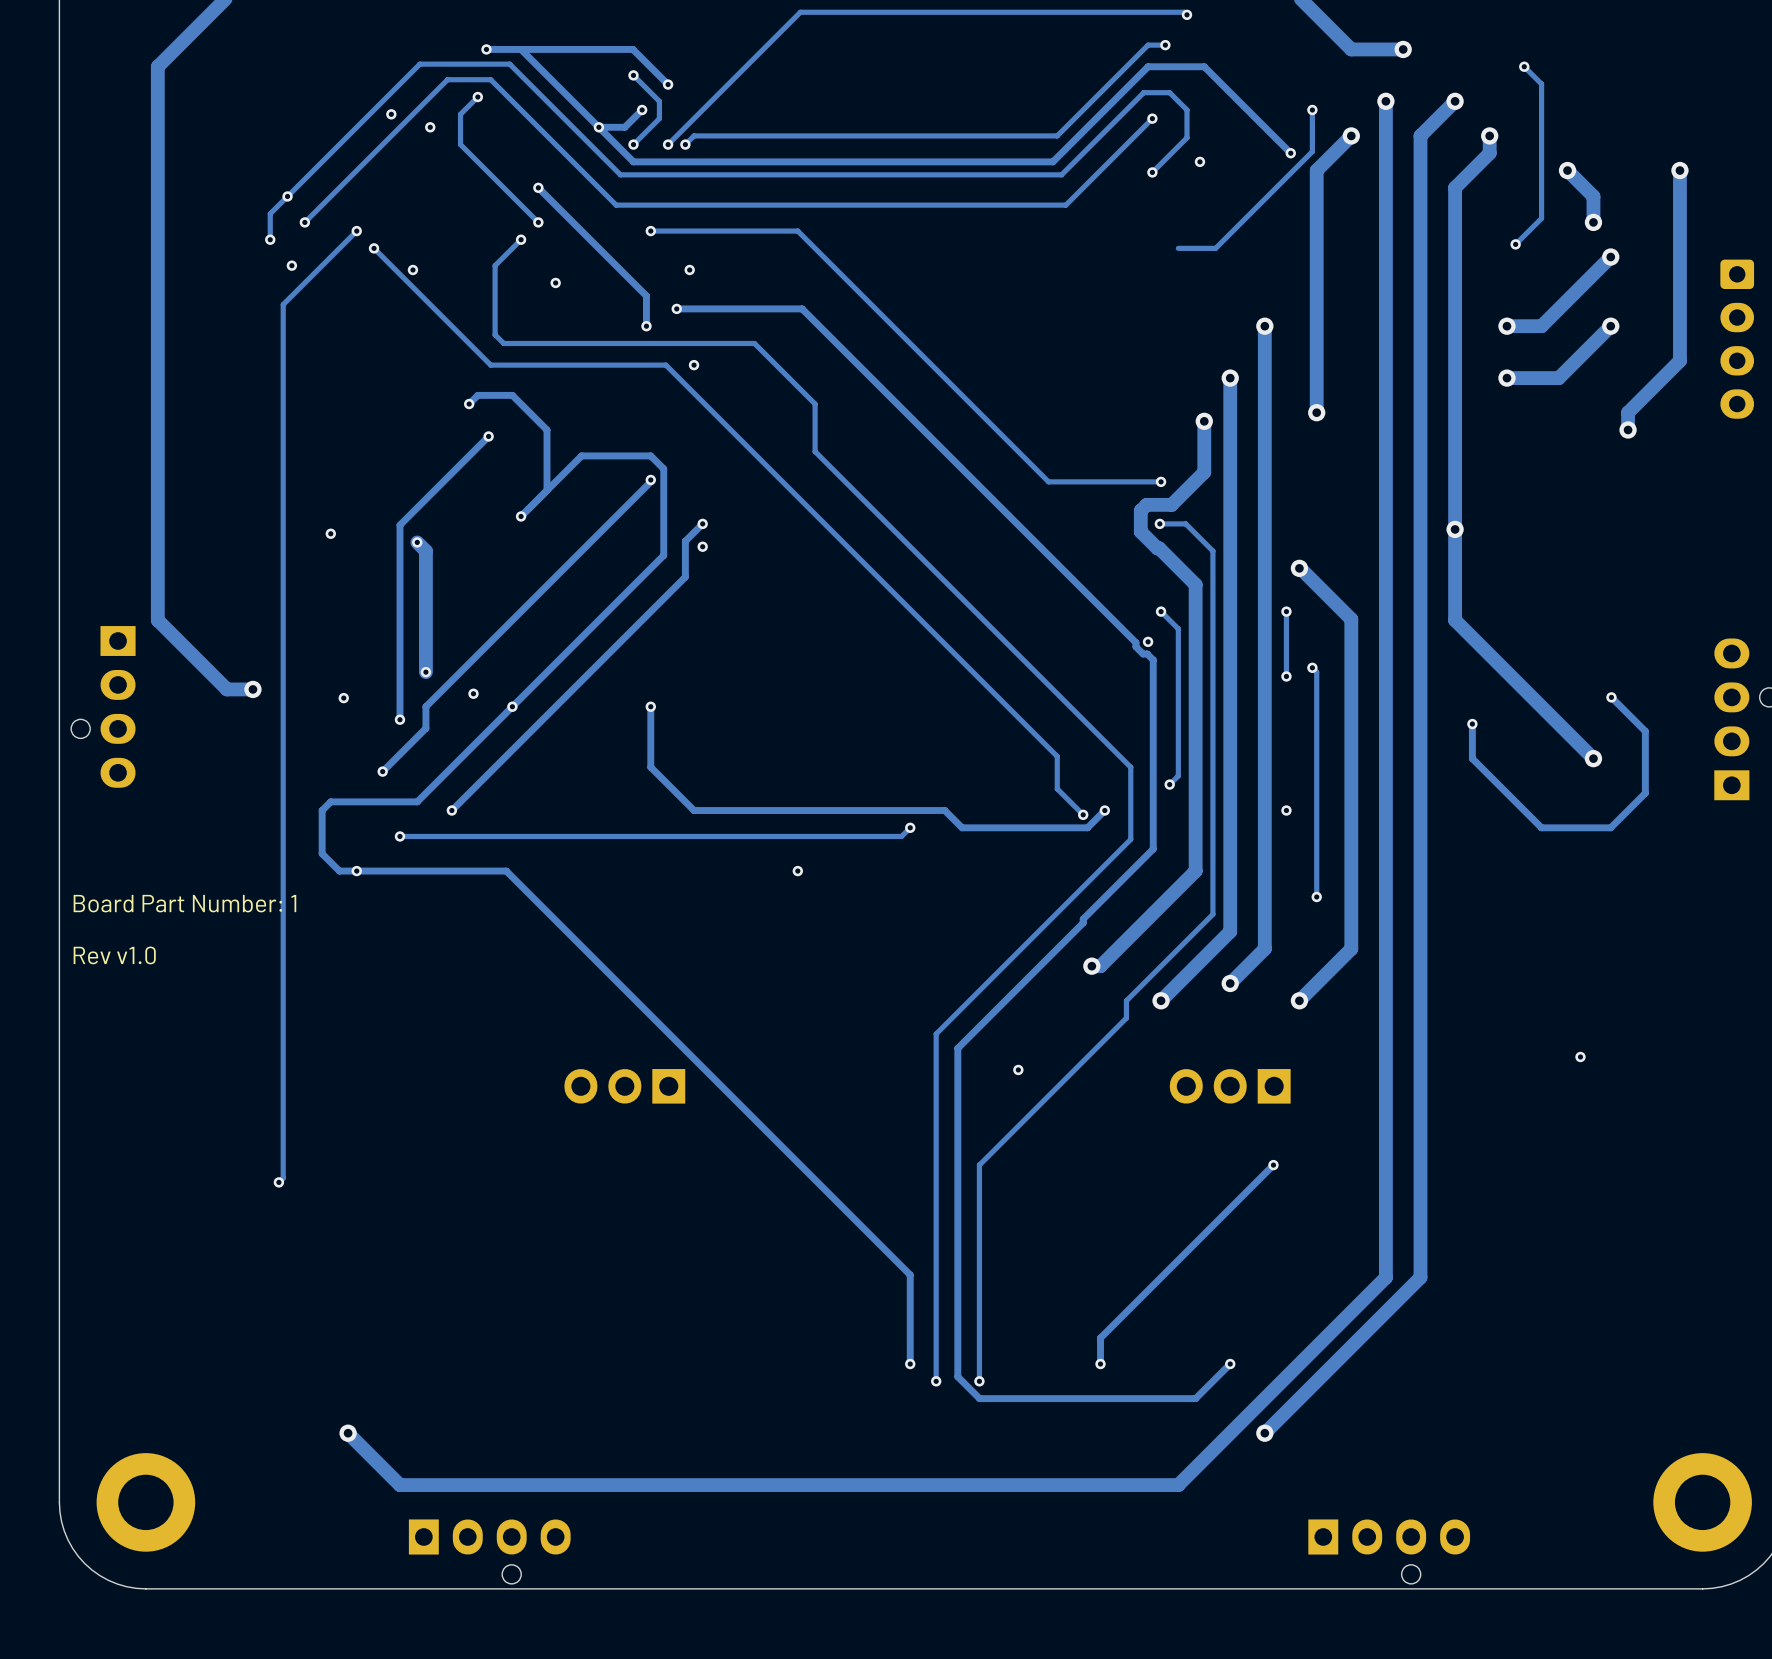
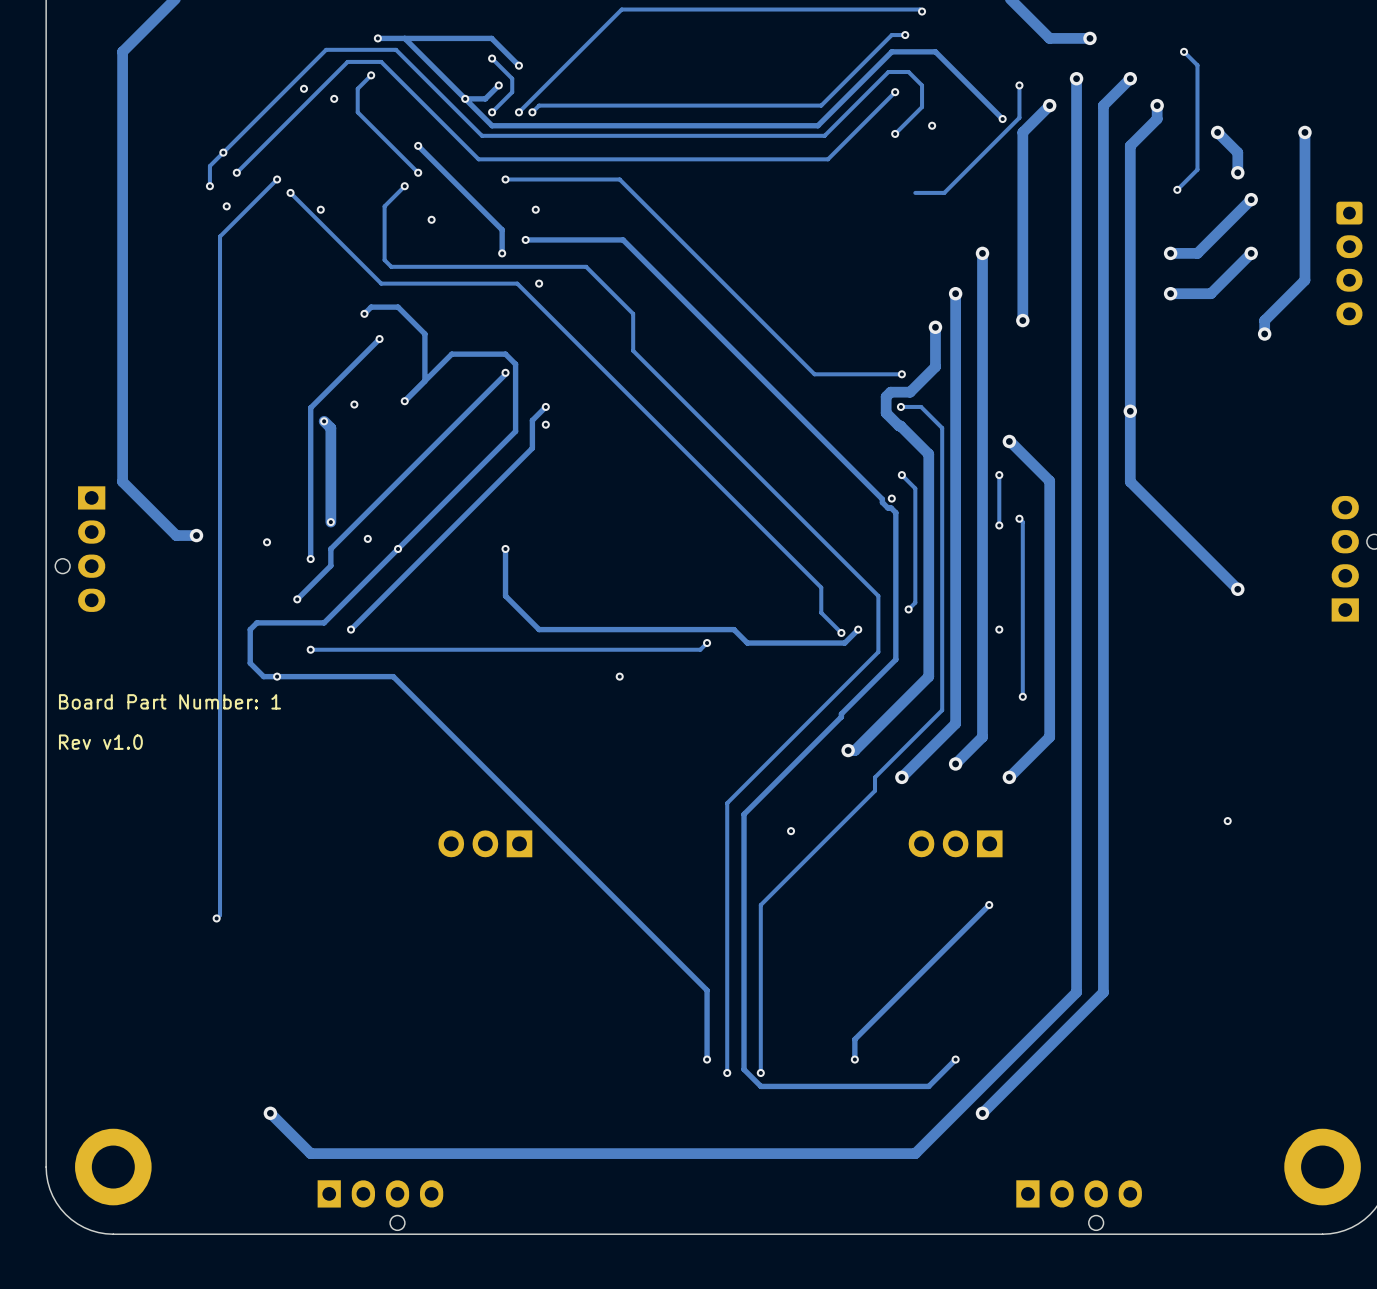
via: none -> (354, 404)
via: (330, 533) -> none
track: (1611, 697) (1645, 731) (1645, 793) (1610, 827) (1541, 827) (1472, 758) (1472, 724) -> none
via: (1611, 697) -> none
via: (1472, 724) -> none

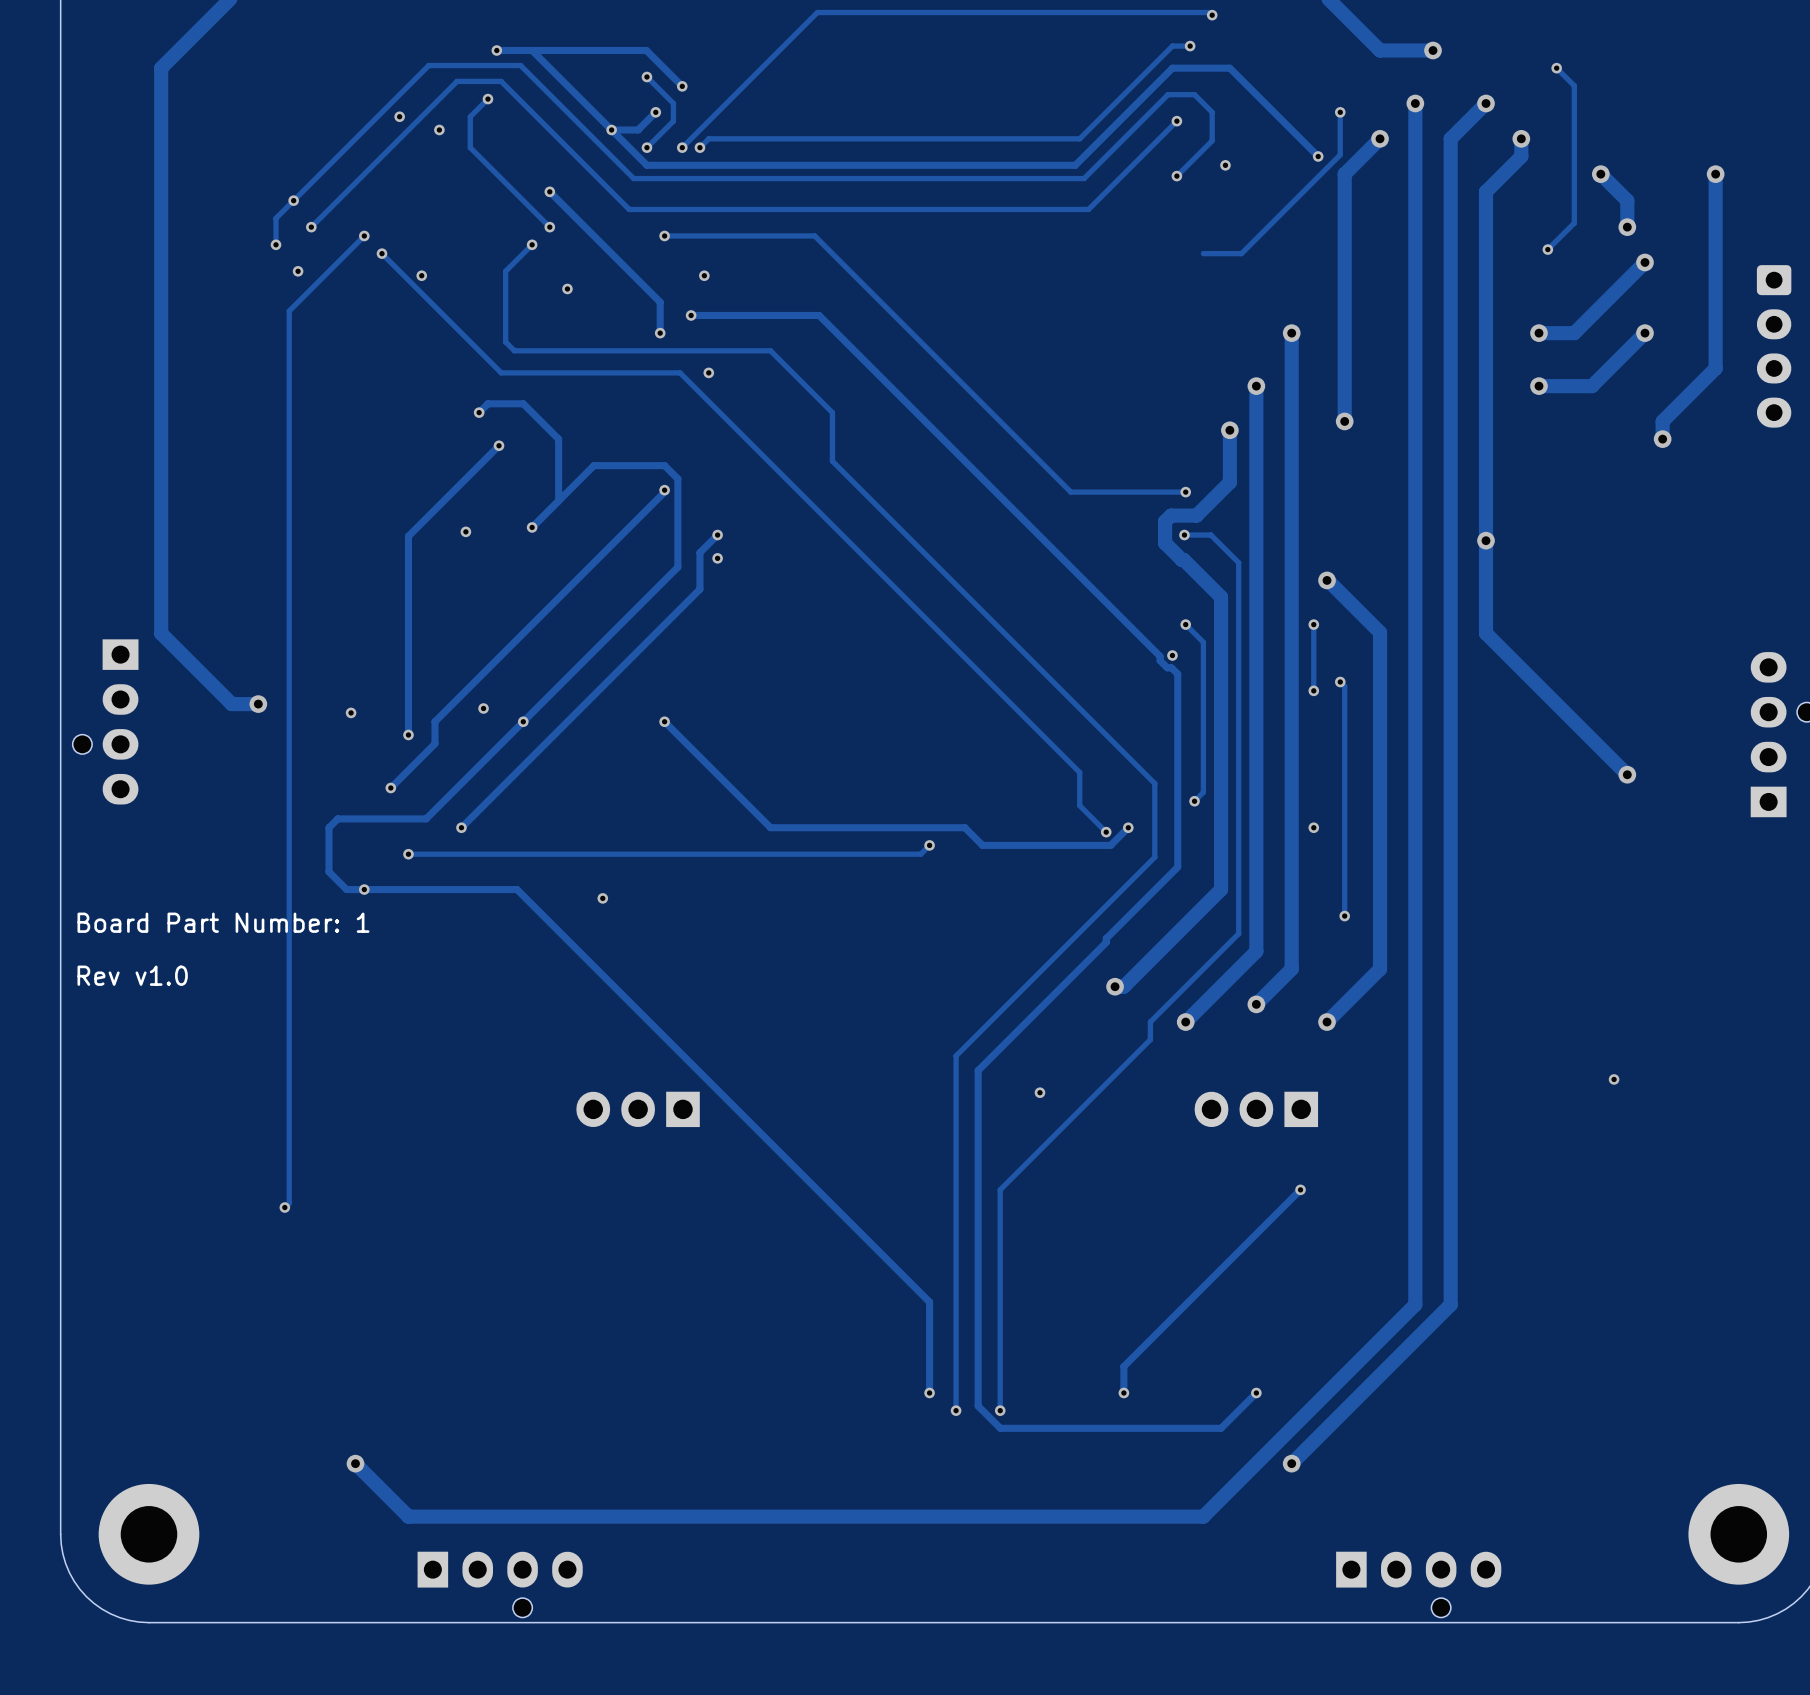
track: (324, 421) (330, 428) (330, 522) -> none
via: (324, 421) -> none
via: (330, 522) -> none
track: (505, 548) (505, 596) (539, 629) (586, 629) -> (664, 721) (770, 827)
via: (619, 676) -> none
via: none -> (602, 898)

